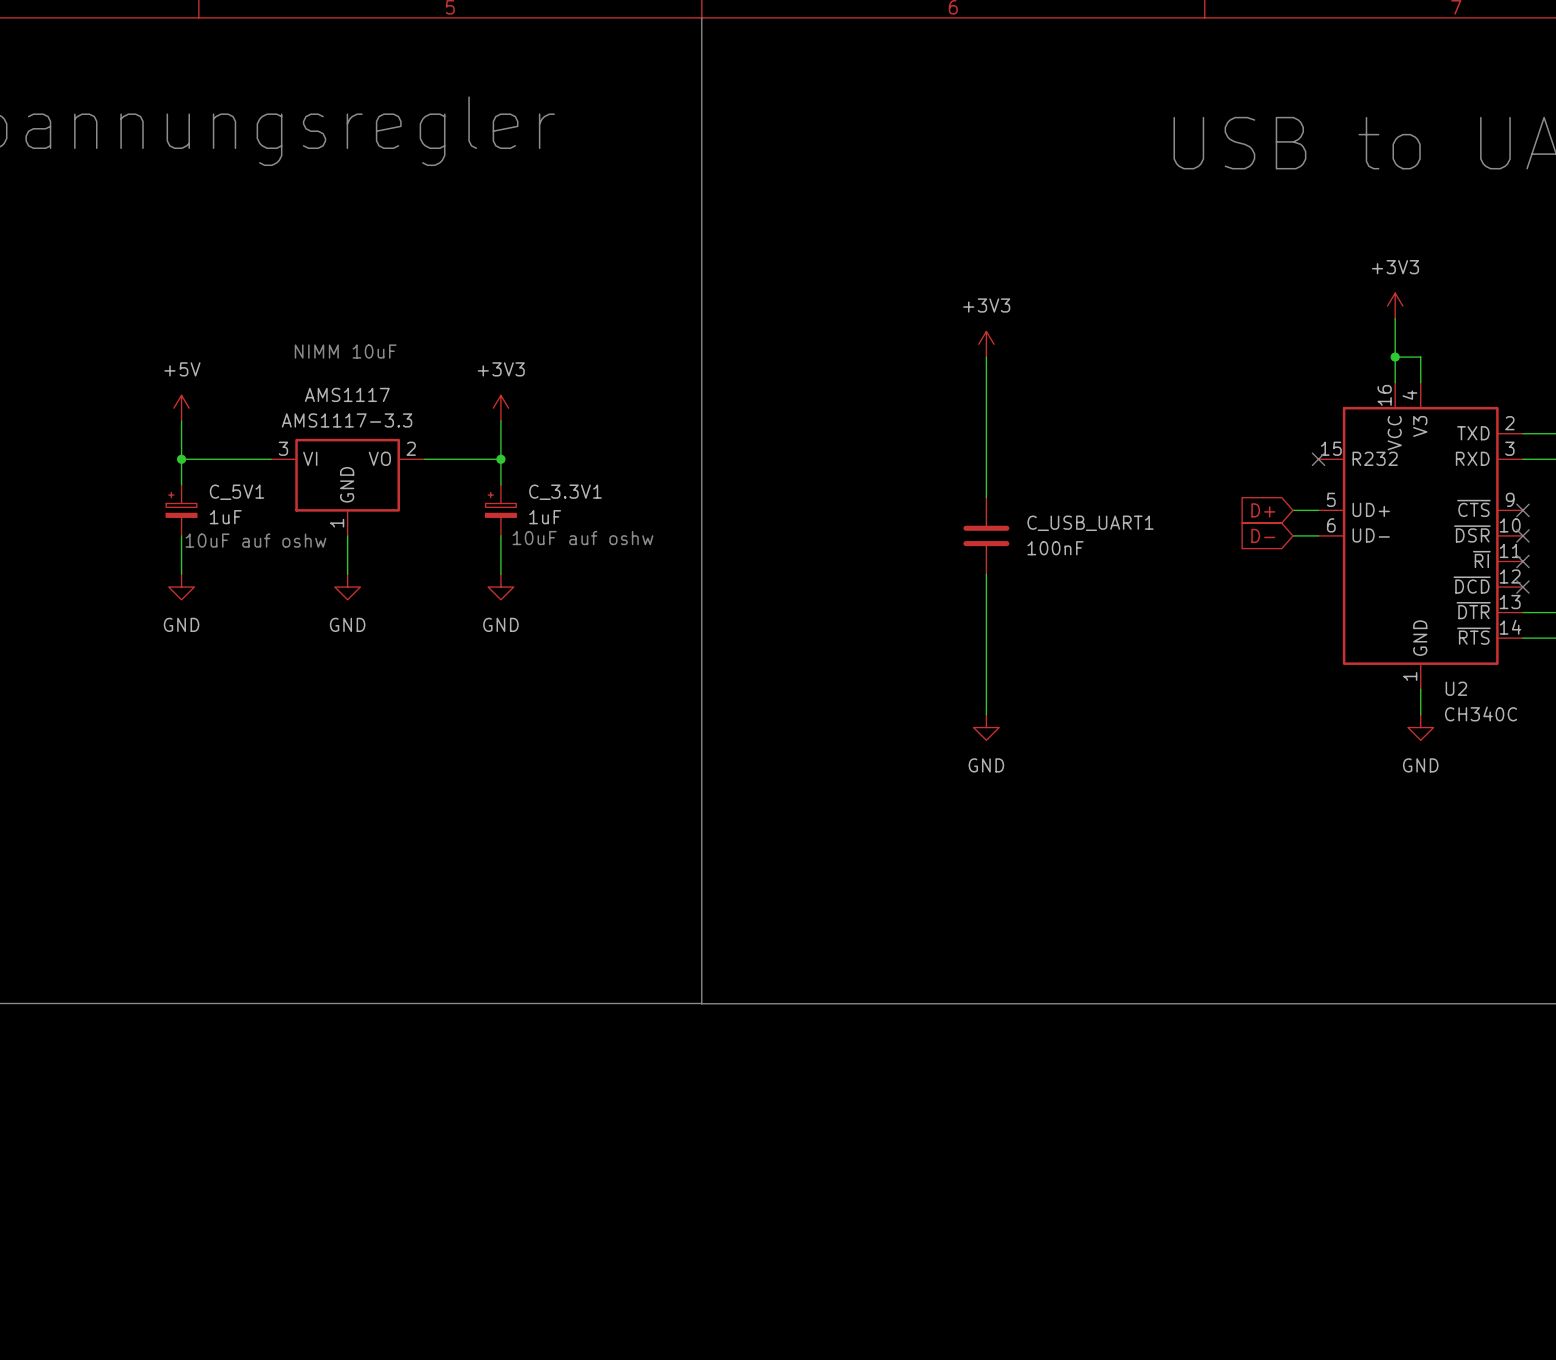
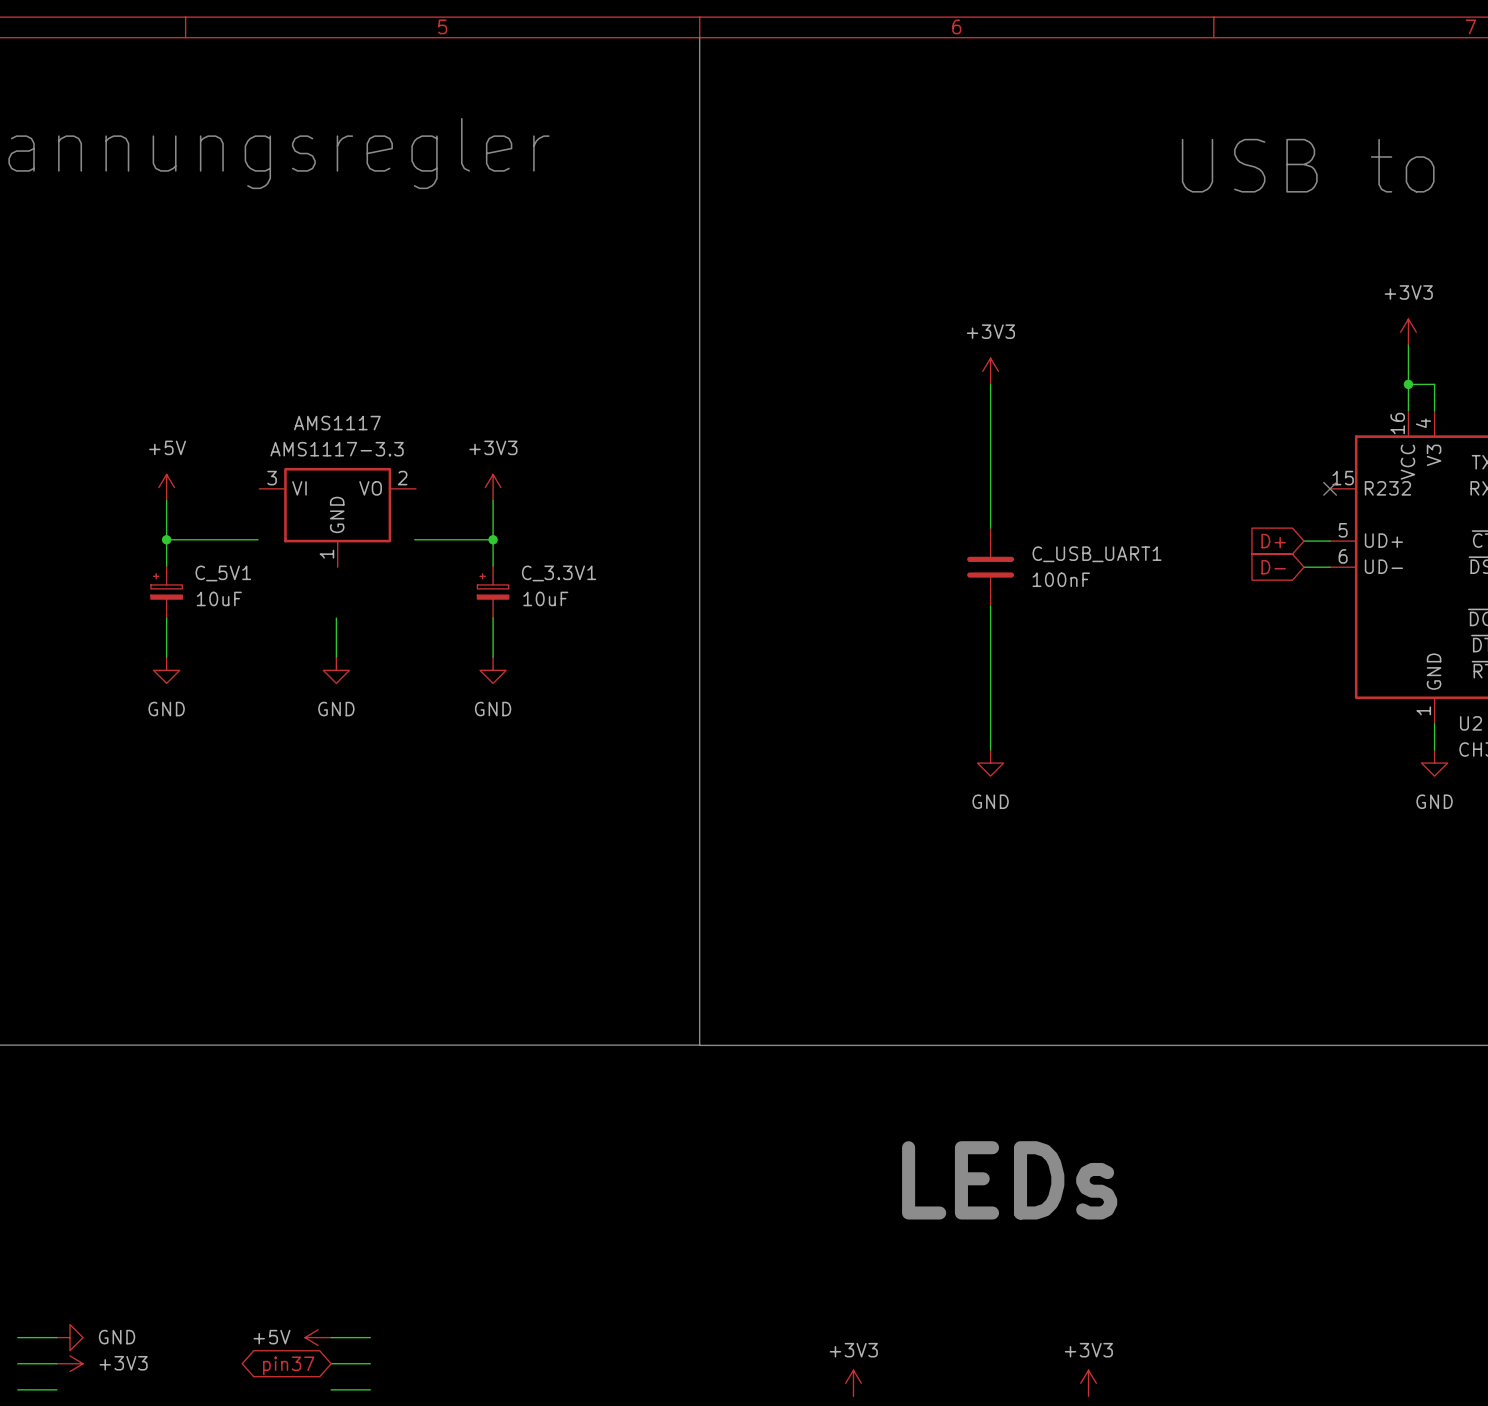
text: NIMM 10uF (345, 351) -> none
power symbol position: +5V (181, 408) -> +5V (166, 487)
power symbol position: +3V3 (500, 408) -> +3V3 (493, 487)
wire: (181, 420) (181, 484) -> (166, 500) (166, 565)
wire: (500, 420) (500, 484) -> (493, 500) (493, 565)
wire: (181, 459) (270, 459) -> (166, 539) (258, 539)
junction position: (181, 459) -> (166, 539)
wire: (424, 459) (500, 459) -> (414, 539) (493, 539)
junction position: (500, 459) -> (493, 539)
C_5V1 position: (181, 510) -> (166, 592)
C_3.3V1 position: (500, 510) -> (493, 592)
C_5V1 value: 1uF (225, 517) -> 10uF (219, 598)
C_3.3V1 value: 1uF (545, 517) -> 10uF (545, 598)
wire: (181, 535) (181, 574) -> (166, 618) (166, 657)
wire: (347, 535) (347, 574) -> (336, 618) (336, 657)
wire: (500, 535) (500, 574) -> (493, 618) (493, 657)
text: 10uF auf oshw (583, 538) -> none
text: 10uF auf oshw (255, 540) -> none
power symbol position: GND (181, 587) -> GND (166, 670)
power symbol position: GND (347, 587) -> GND (336, 670)
power symbol position: GND (500, 587) -> GND (493, 670)
text: none -> LEDs (1009, 1180)
wire: none -> (17, 1337) (56, 1337)
power symbol: none -> GND (70, 1337)
power symbol: none -> +5V (318, 1337)
wire: none -> (331, 1337) (370, 1337)
wire: none -> (17, 1363) (56, 1363)
power symbol: none -> +3V3 (70, 1363)
wire: none -> (331, 1363) (370, 1363)
global label: none -> pin37 (288, 1365)
power symbol: none -> +3V3 (853, 1383)
power symbol: none -> +3V3 (1088, 1383)
wire: none -> (17, 1389) (56, 1389)
wire: none -> (331, 1389) (370, 1389)

